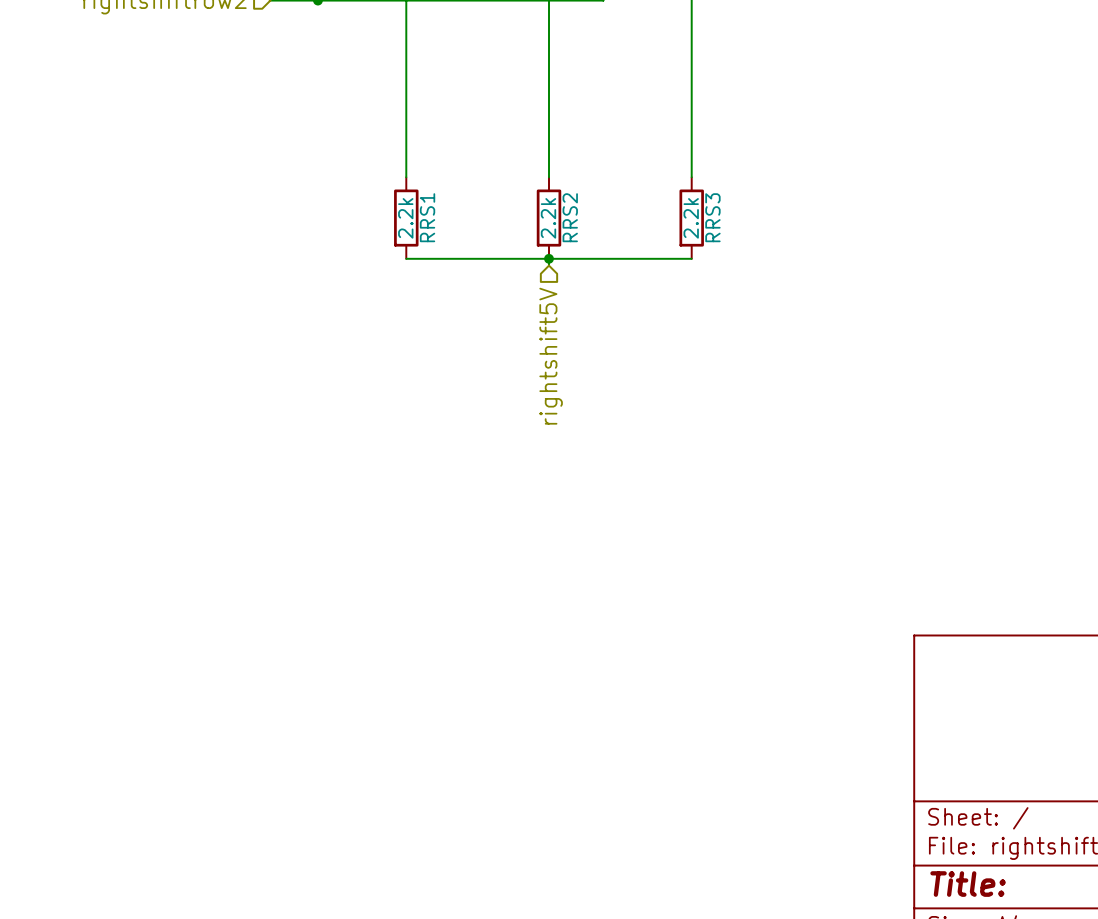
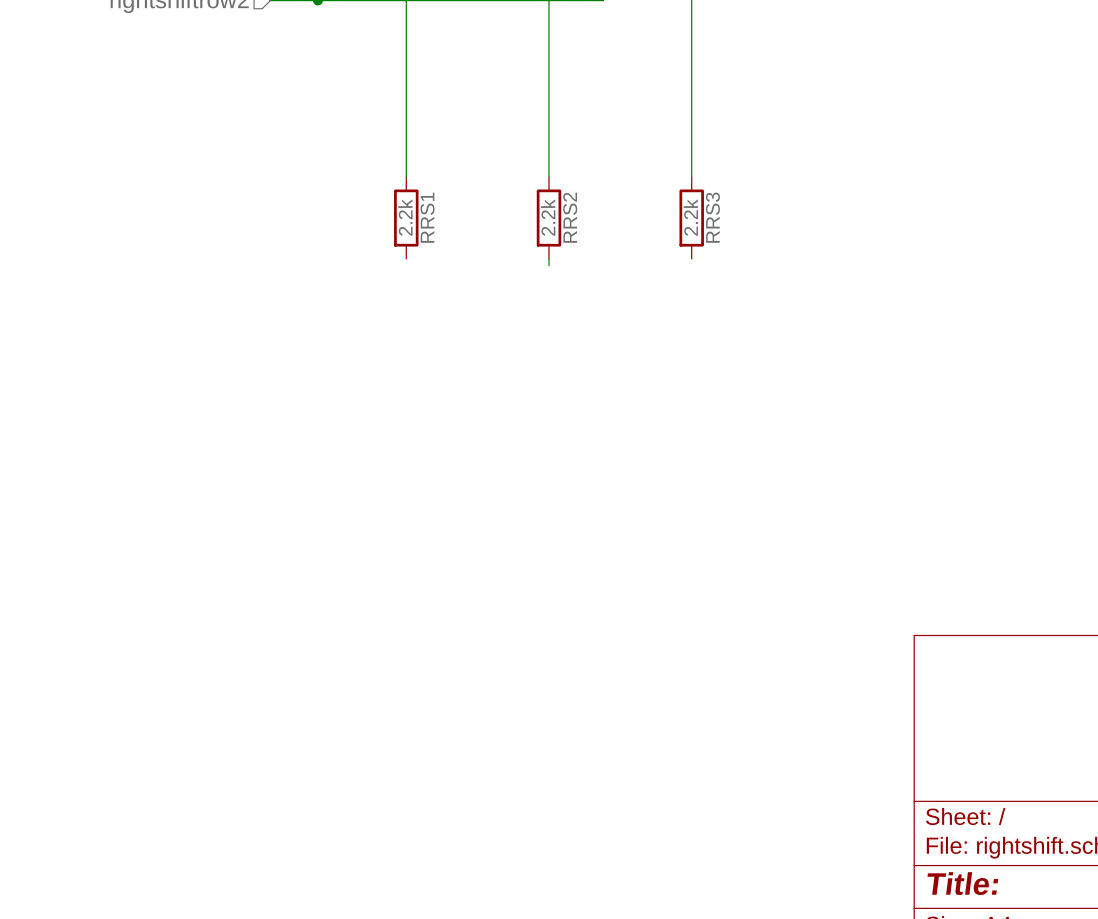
wire: (406, 258) (691, 258) -> none
junction: (549, 258) -> none
hierarchical label: rightshift5V (551, 356) -> none

